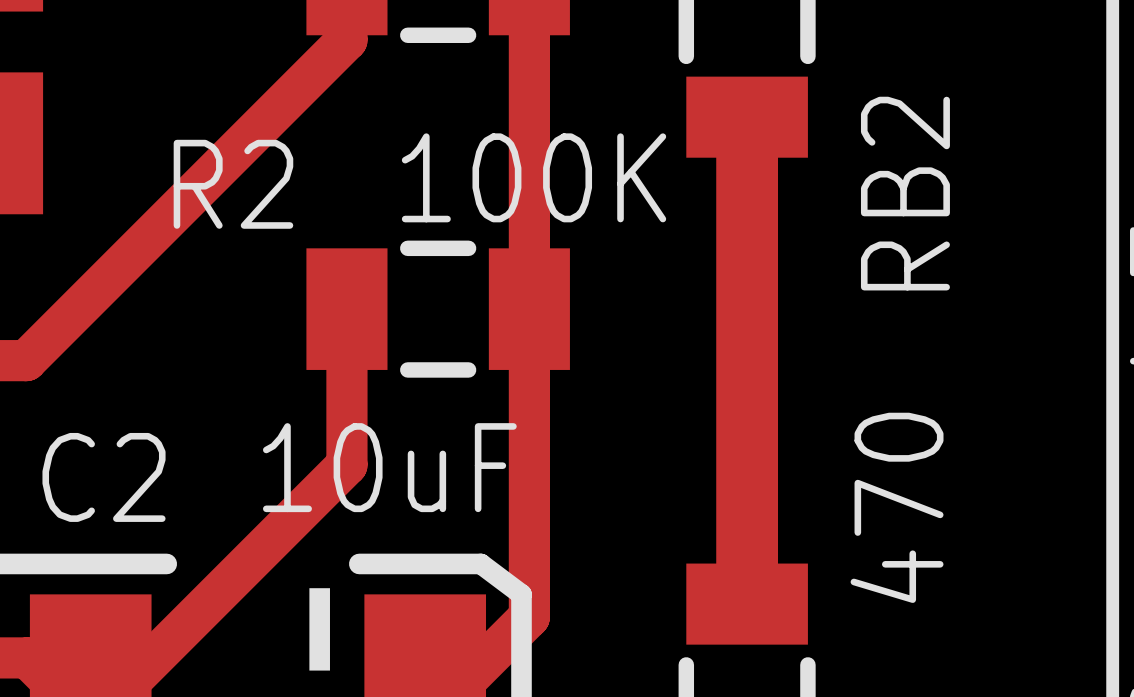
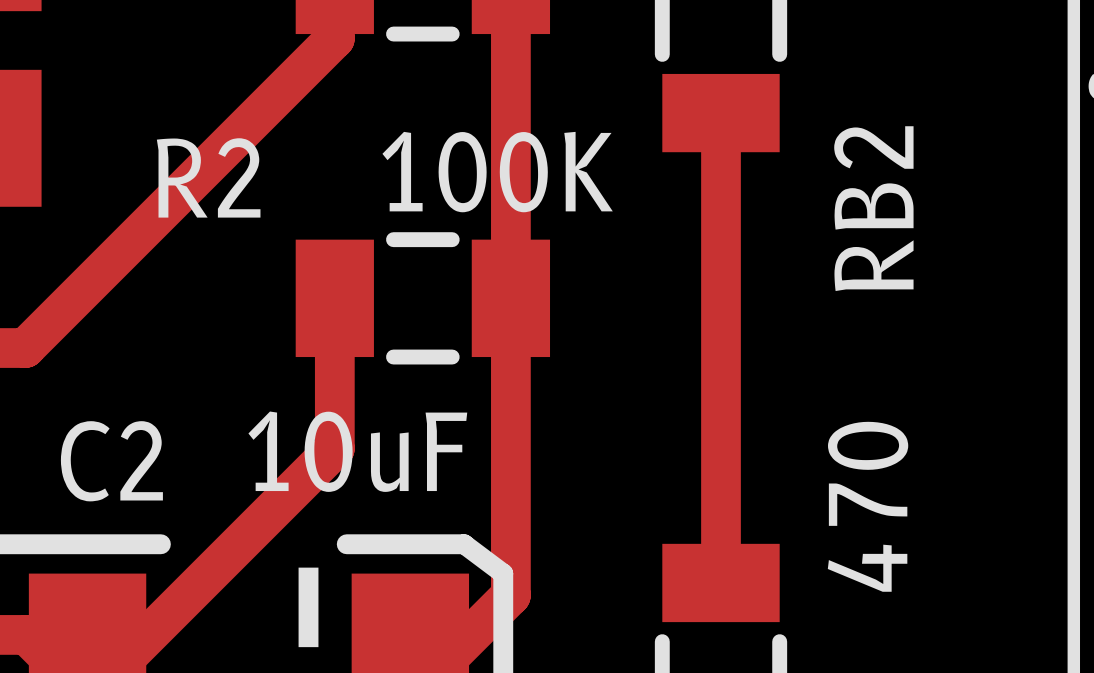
track width: thick (747, 117) (747, 604) -> thin (721, 113) (721, 582)

